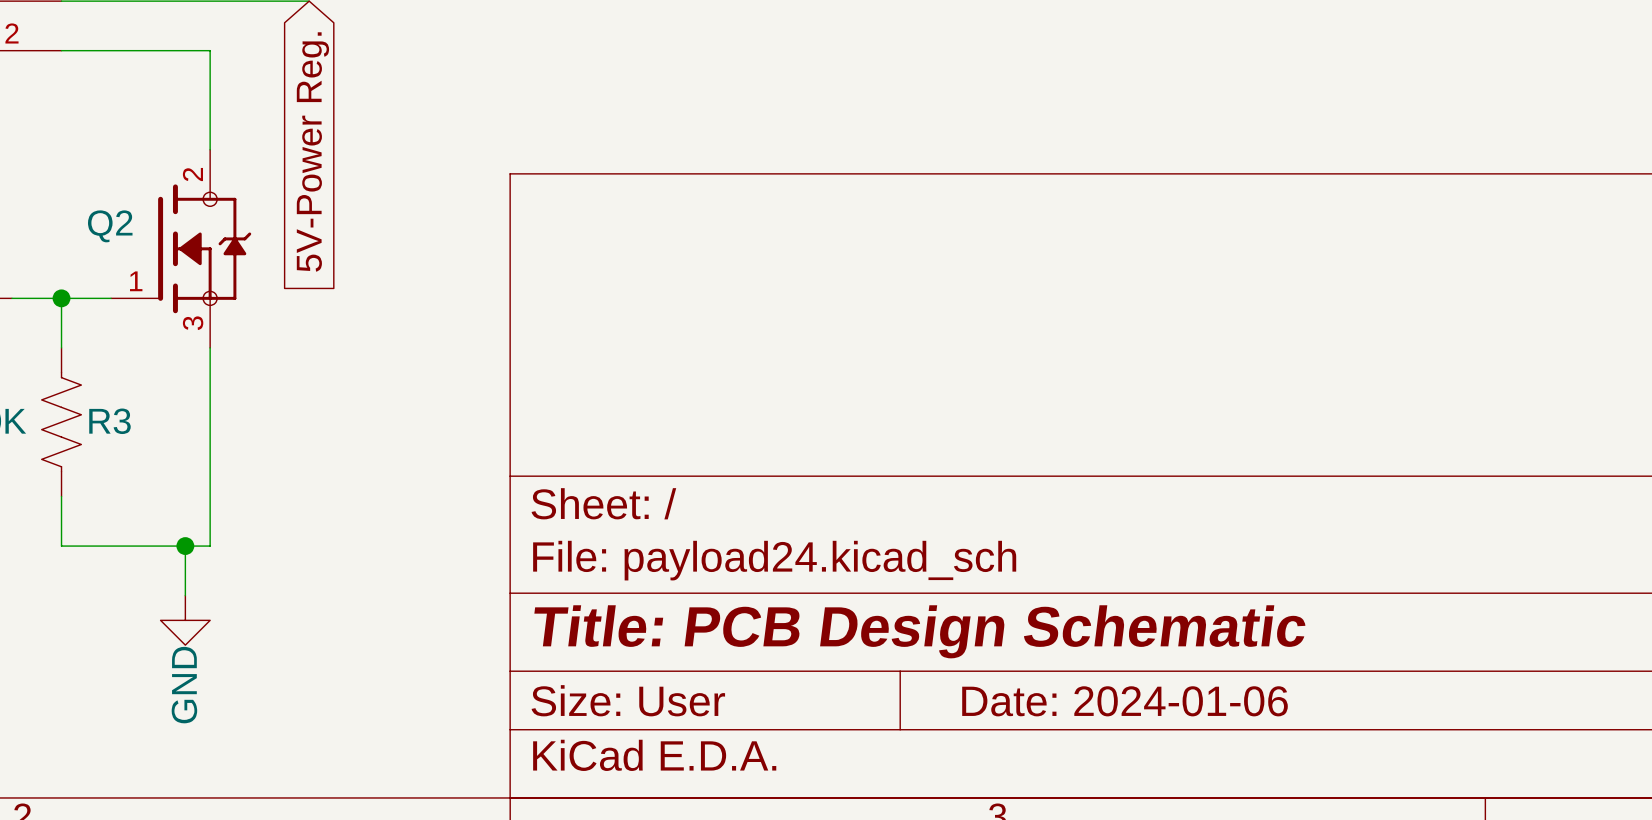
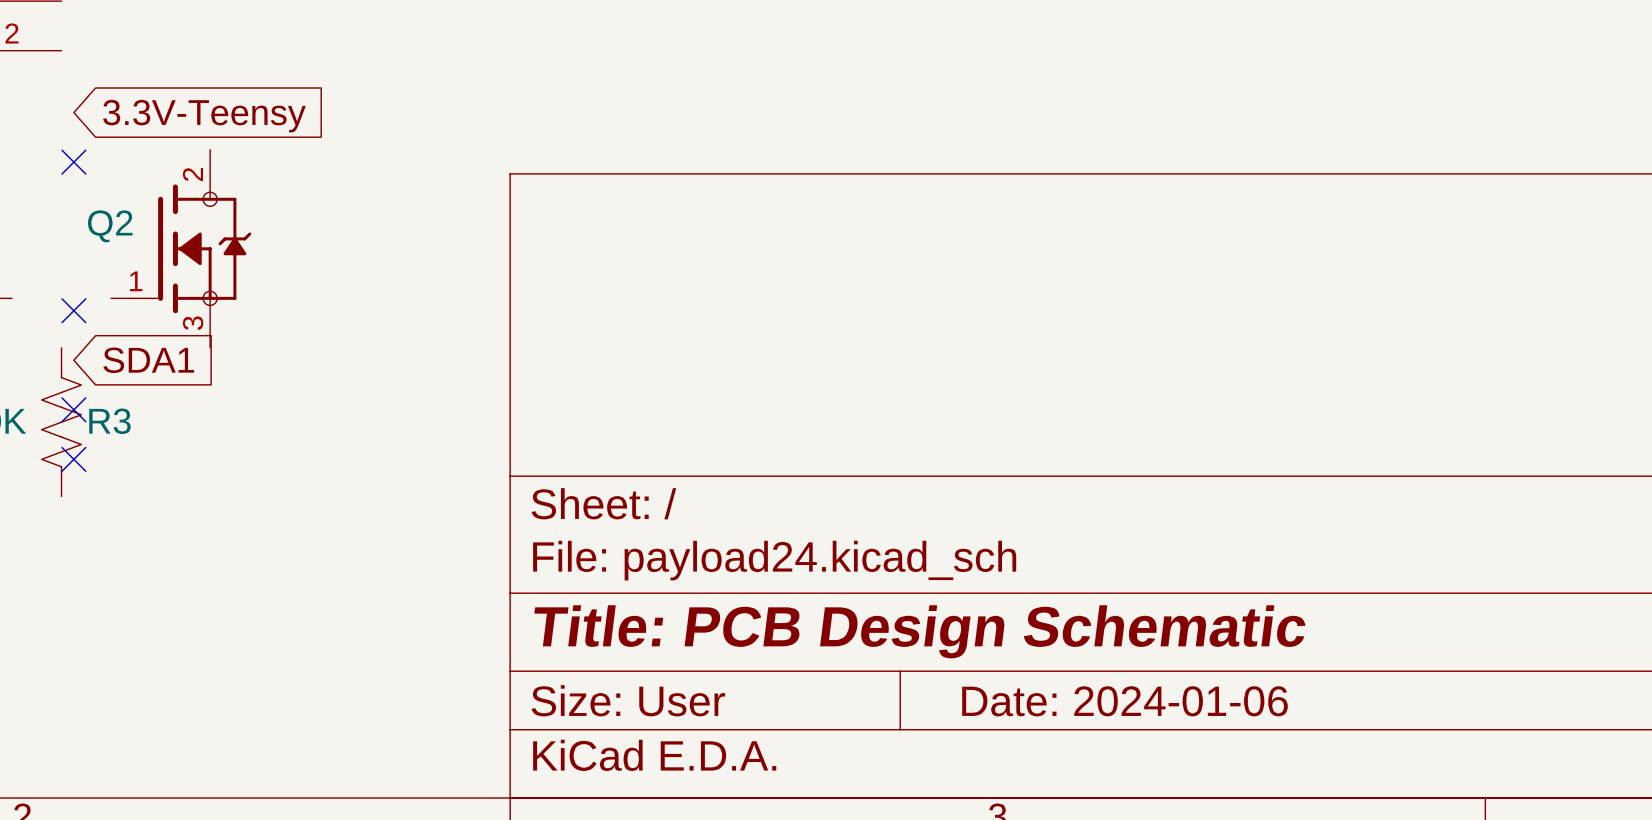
wire: (61, 1) (309, 1) -> none
wire: (61, 50) (210, 50) (210, 149) -> none
global label: none -> 3.3V-Teensy (204, 116)
global label: 5V-Power Reg. (312, 151) -> none
no-connect mark: none -> (73, 162)
wire: (11, 298) (111, 298) -> none
wire: (61, 298) (61, 347) -> none
junction: (61, 298) -> none
no-connect mark: none -> (73, 310)
wire: (210, 347) (210, 546) (61, 546) (61, 496) -> none
global label: none -> SDA1 (148, 360)
no-connect mark: none -> (73, 409)
no-connect mark: none -> (73, 459)
wire: (185, 546) (185, 595) -> none
junction: (185, 546) -> none
power symbol: GND (185, 620) -> none

